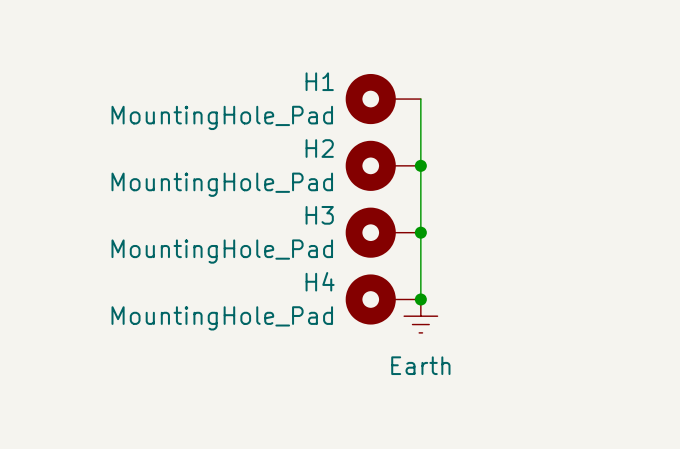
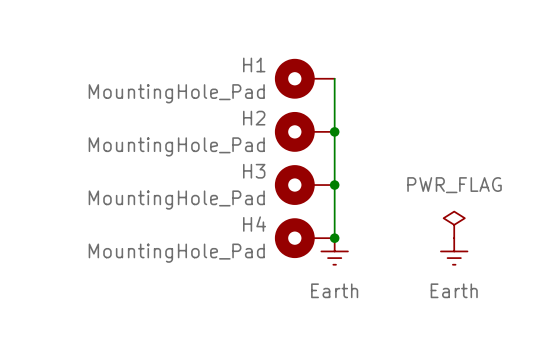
power symbol: none -> PWR_FLAG (454, 224)
power symbol: none -> Earth (454, 251)

